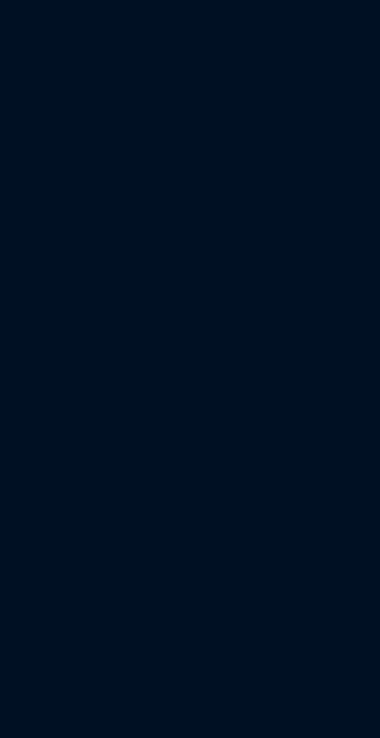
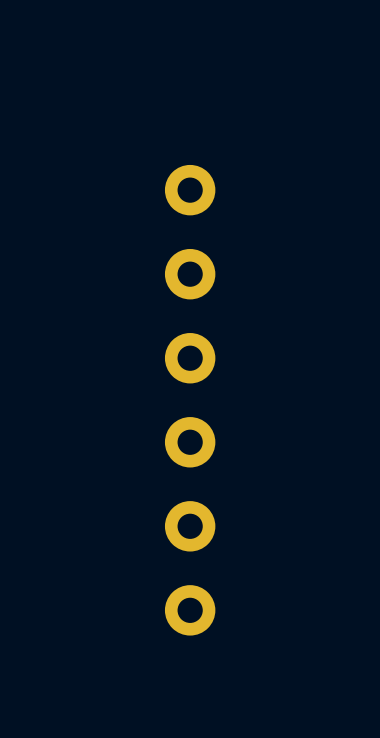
part: none -> (190, 400)

